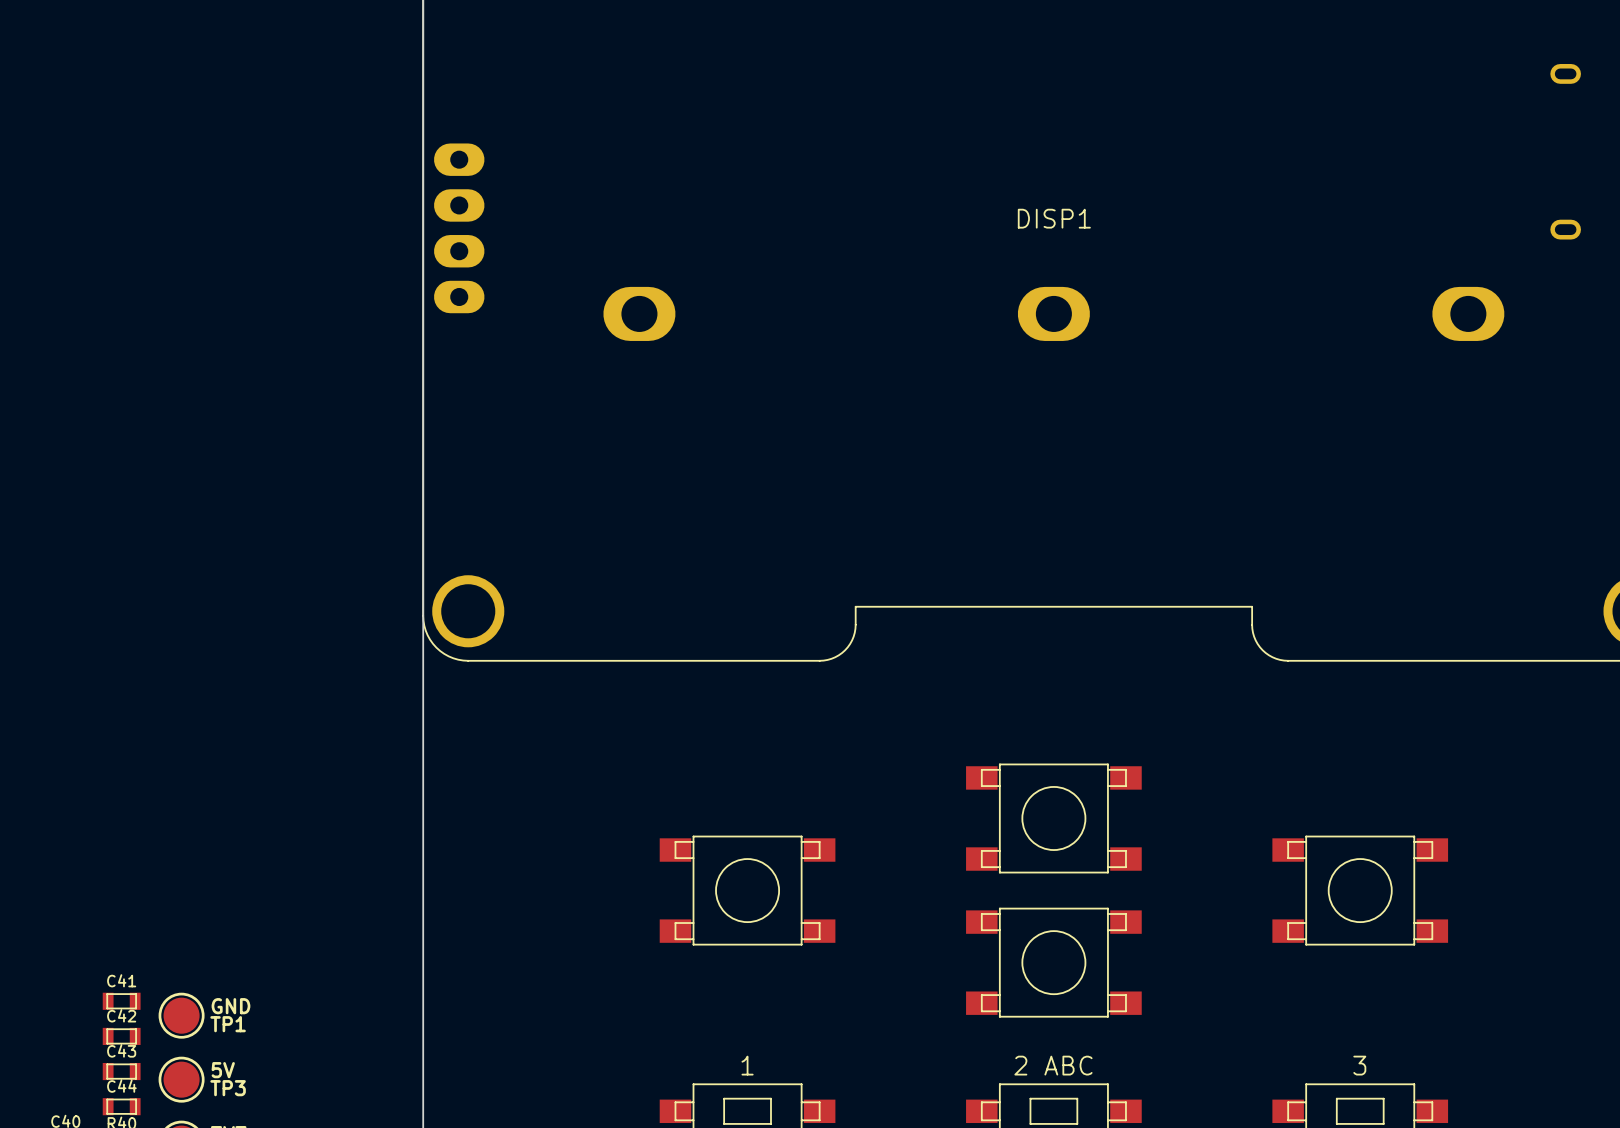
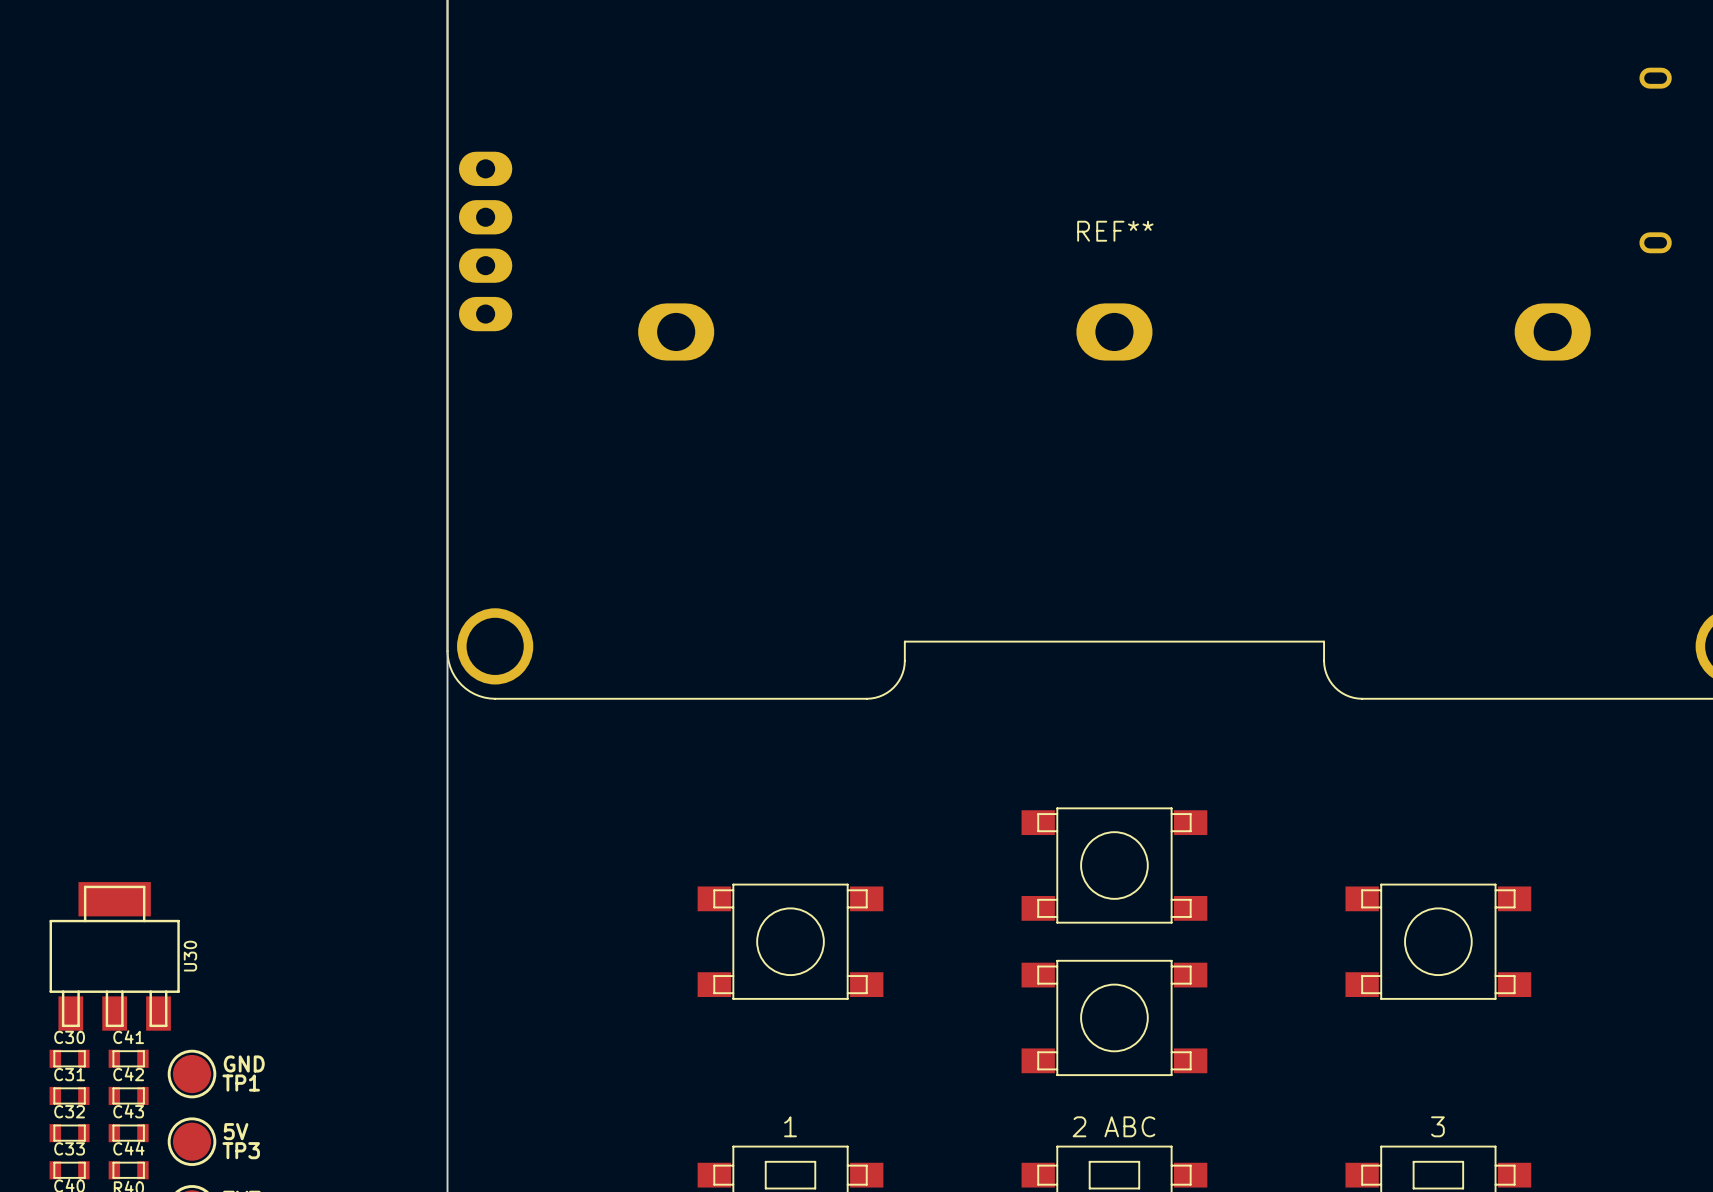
DISP1 name: DISP1 (1054, 218) -> REF** (1115, 231)
U30: none -> (114, 956)
C30: none -> (69, 1058)
C31: none -> (69, 1095)
C32: none -> (69, 1133)
C33: none -> (69, 1170)

